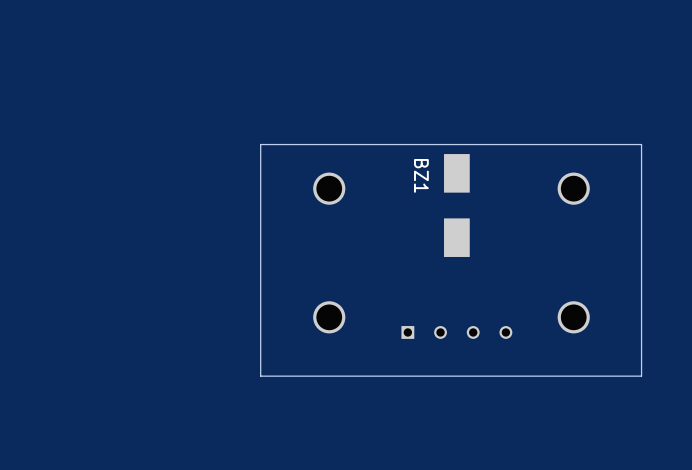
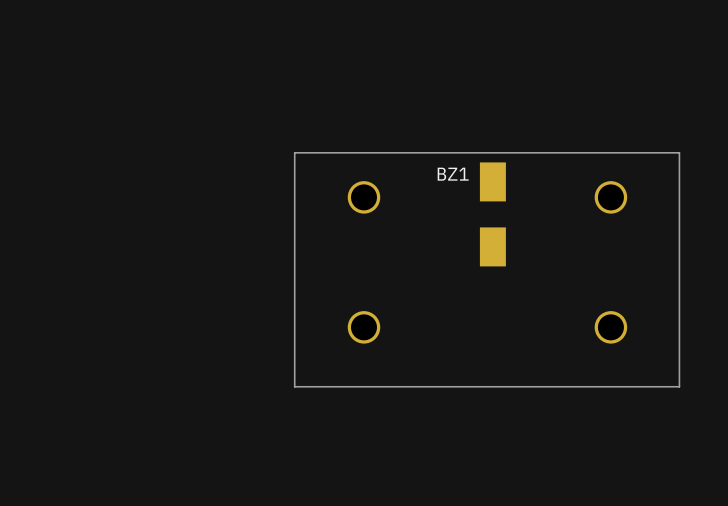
BZ1 name rotation: 0° (421, 175) -> 90° counterclockwise (453, 174)
part: (456, 332) -> none

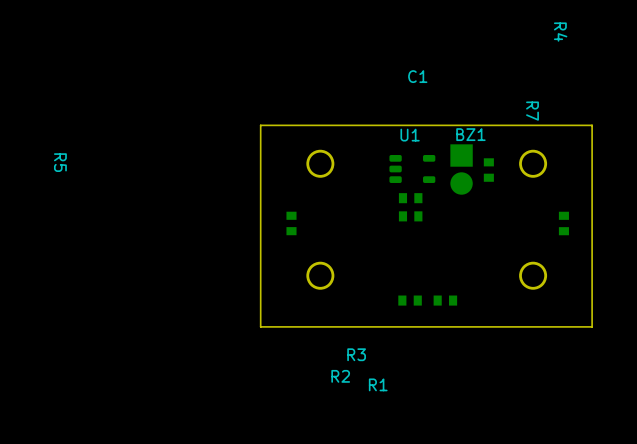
BZ1 footprint: [479, 162, 506, 267] -> [450, 144, 473, 195]
BZ1 name position: BZ1 (453, 174) -> BZ1 (470, 134)
U1: none -> (412, 168)
R4: none -> (488, 170)
C1: none -> (410, 198)
R3: none -> (410, 216)
R5: none -> (291, 223)
R7: none -> (563, 223)
R1: none -> (410, 300)
R2: none -> (445, 300)

